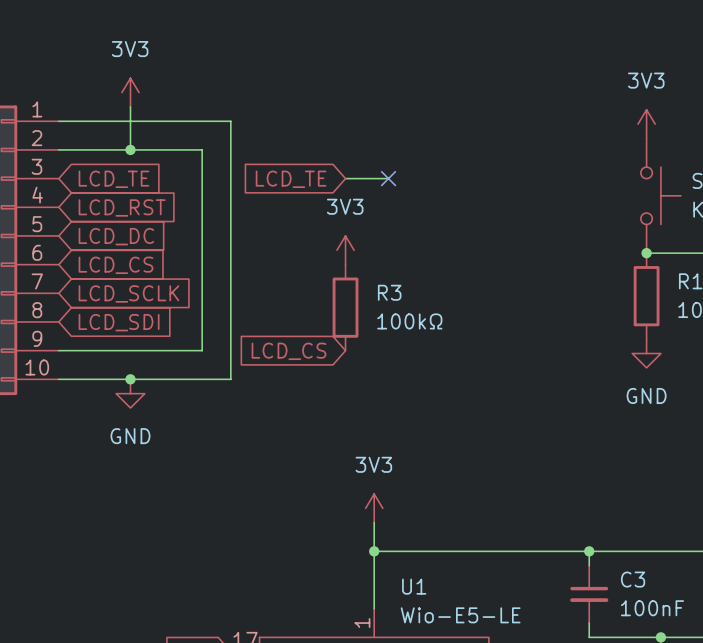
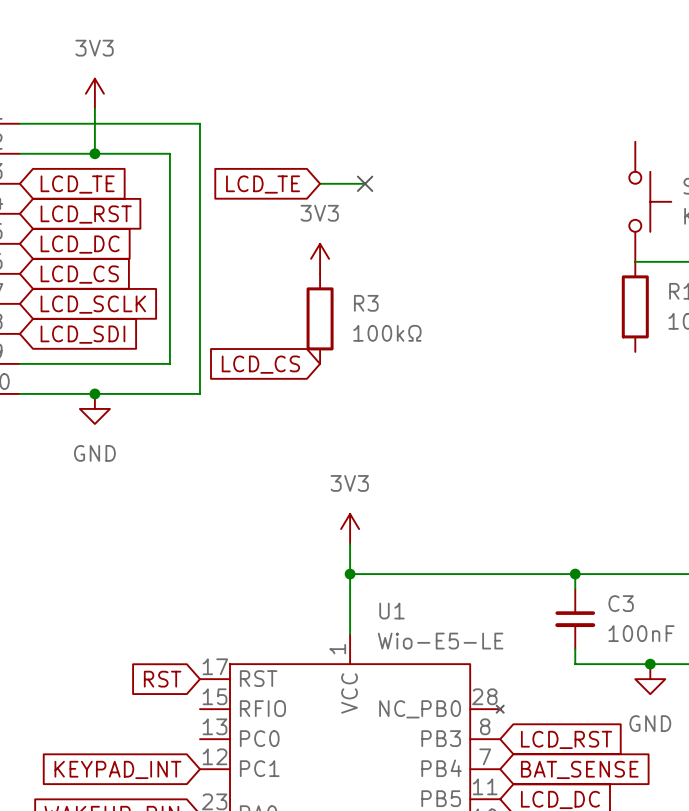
power symbol: 3V3 (646, 124) -> none
junction: (646, 253) -> none
power symbol: GND (646, 353) -> none

